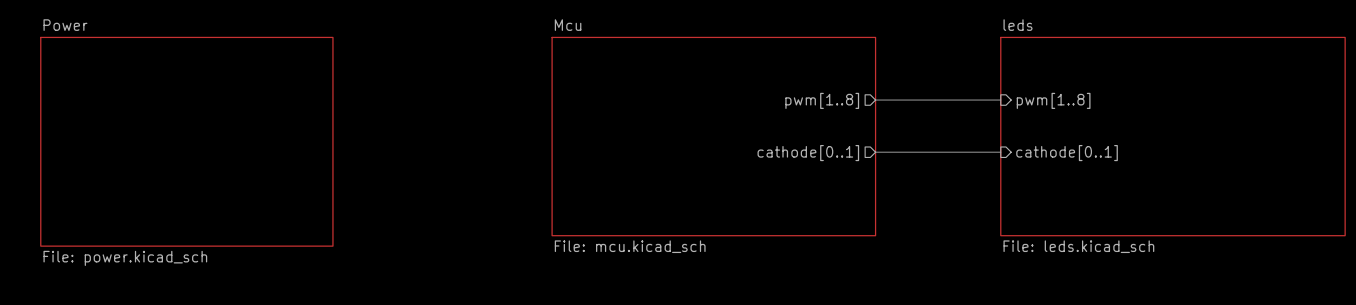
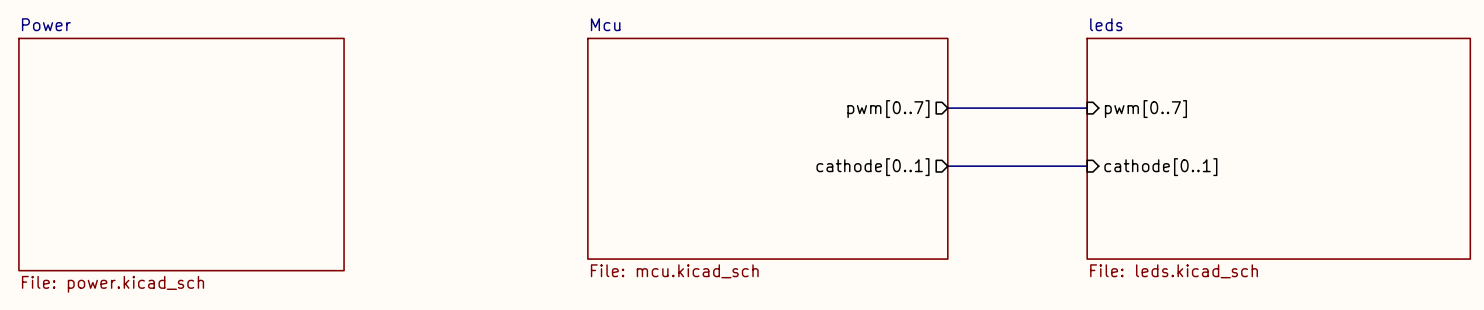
sheet pin: pwm[1..8] (822, 100) -> pwm[0..7] (888, 109)
sheet pin: pwm[1..8] (1053, 100) -> pwm[0..7] (1145, 109)

